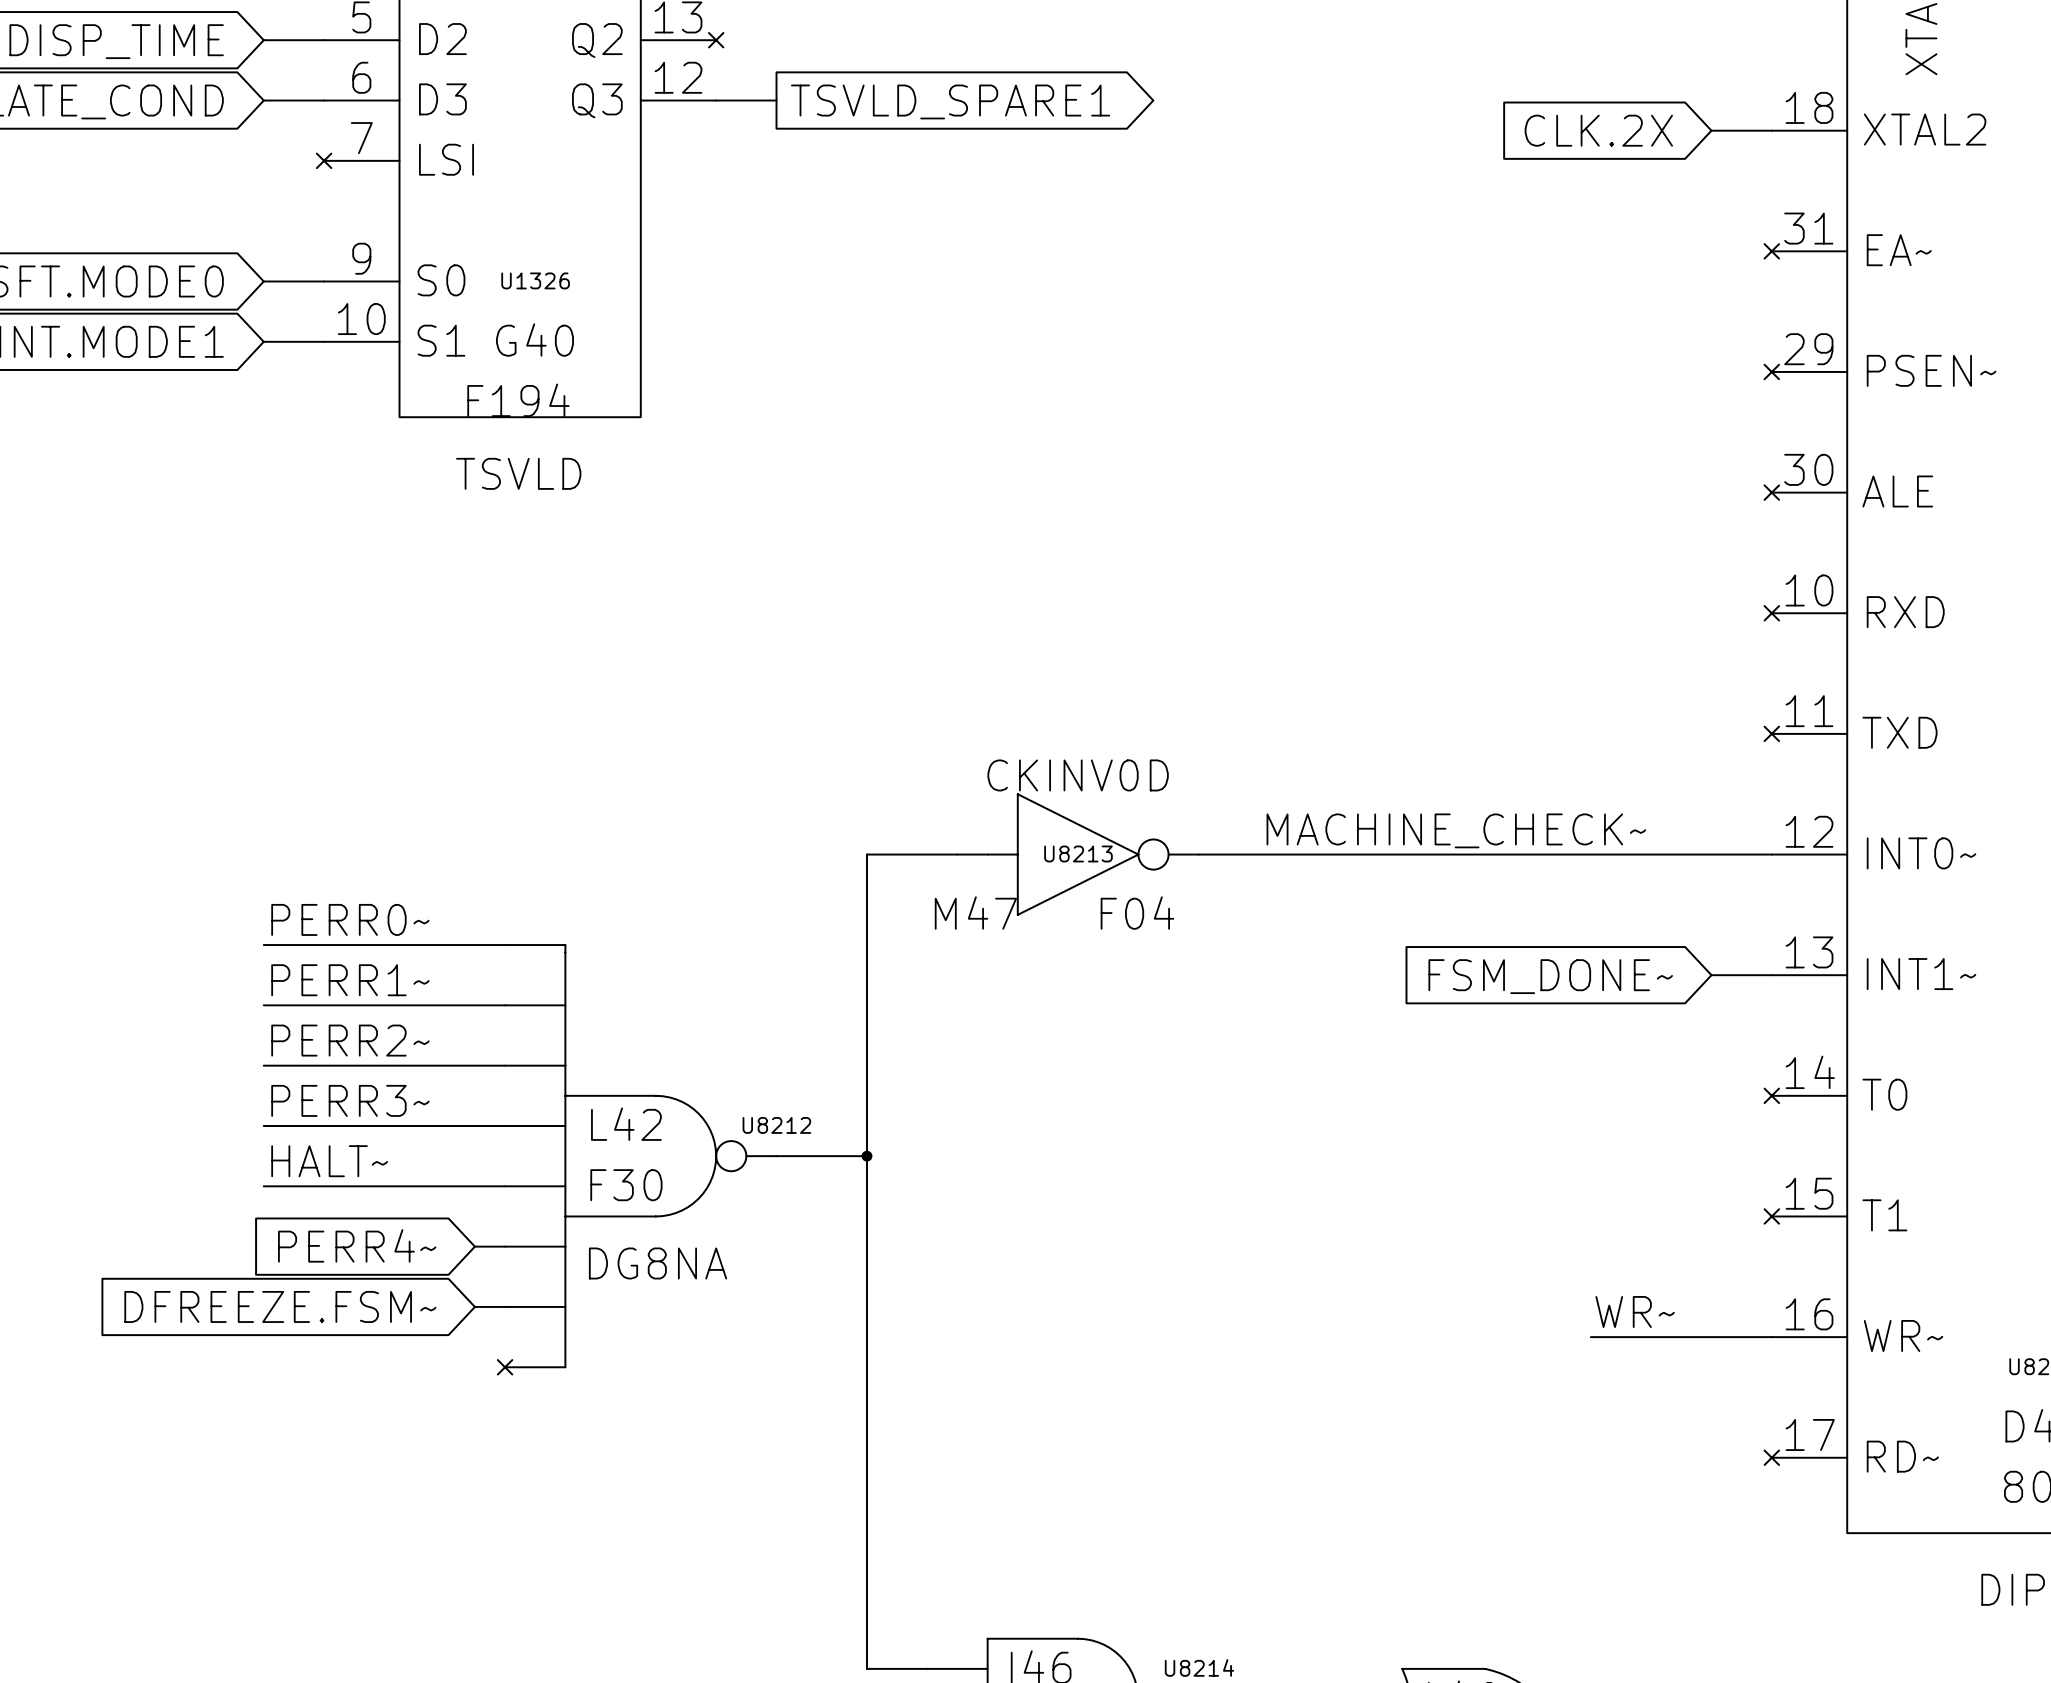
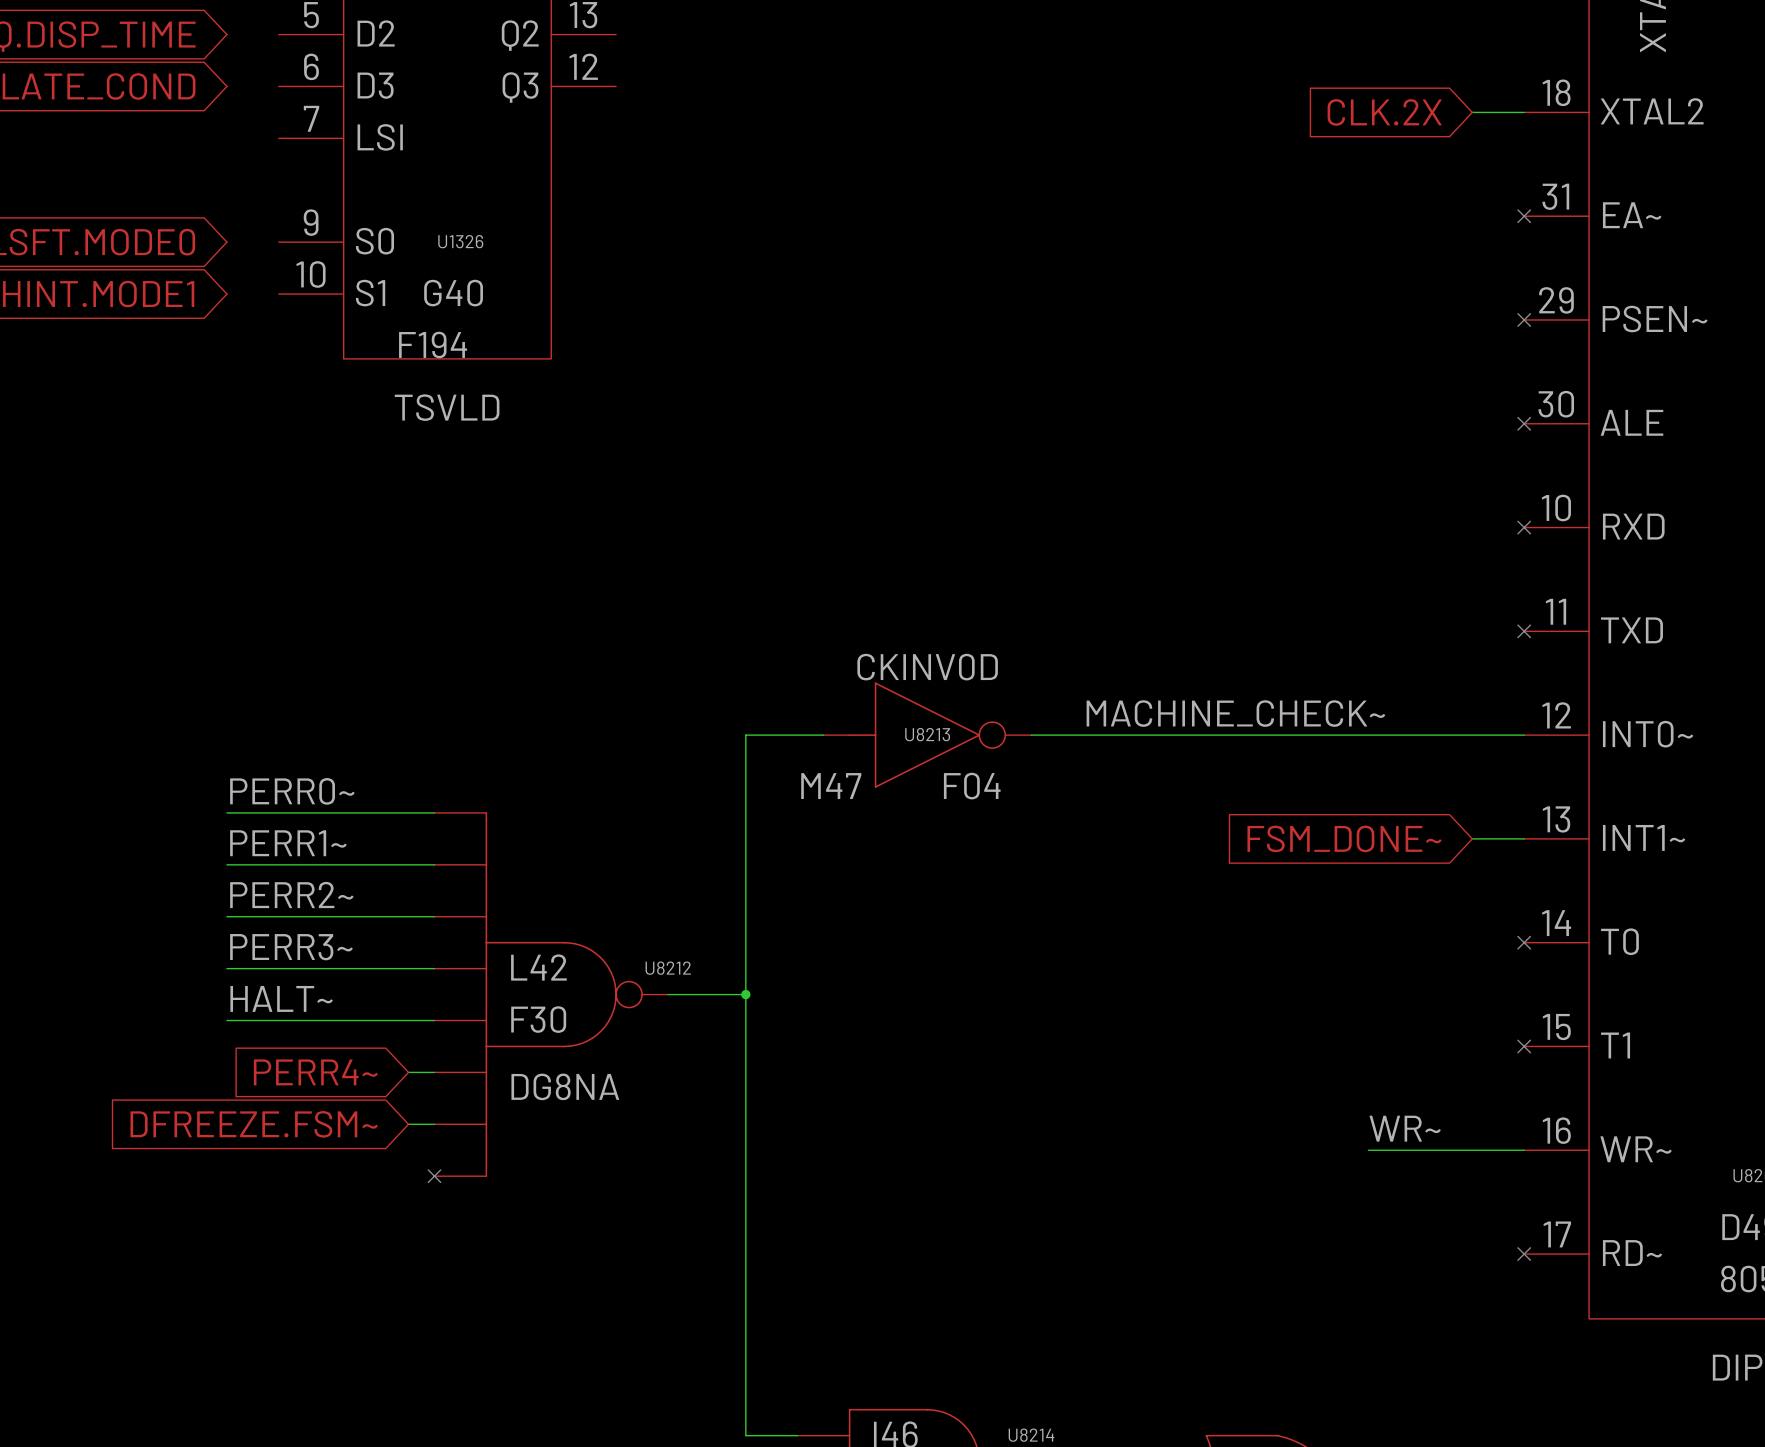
wire: (263, 40) (324, 40) -> none
no-connect mark: (716, 40) -> none
wire: (263, 100) (324, 100) -> none
wire: (716, 100) (776, 100) -> none
global label: TSVLD_SPARE1 (950, 101) -> none
no-connect mark: (324, 160) -> none
wire: (263, 281) (324, 281) -> none
wire: (263, 341) (324, 341) -> none

